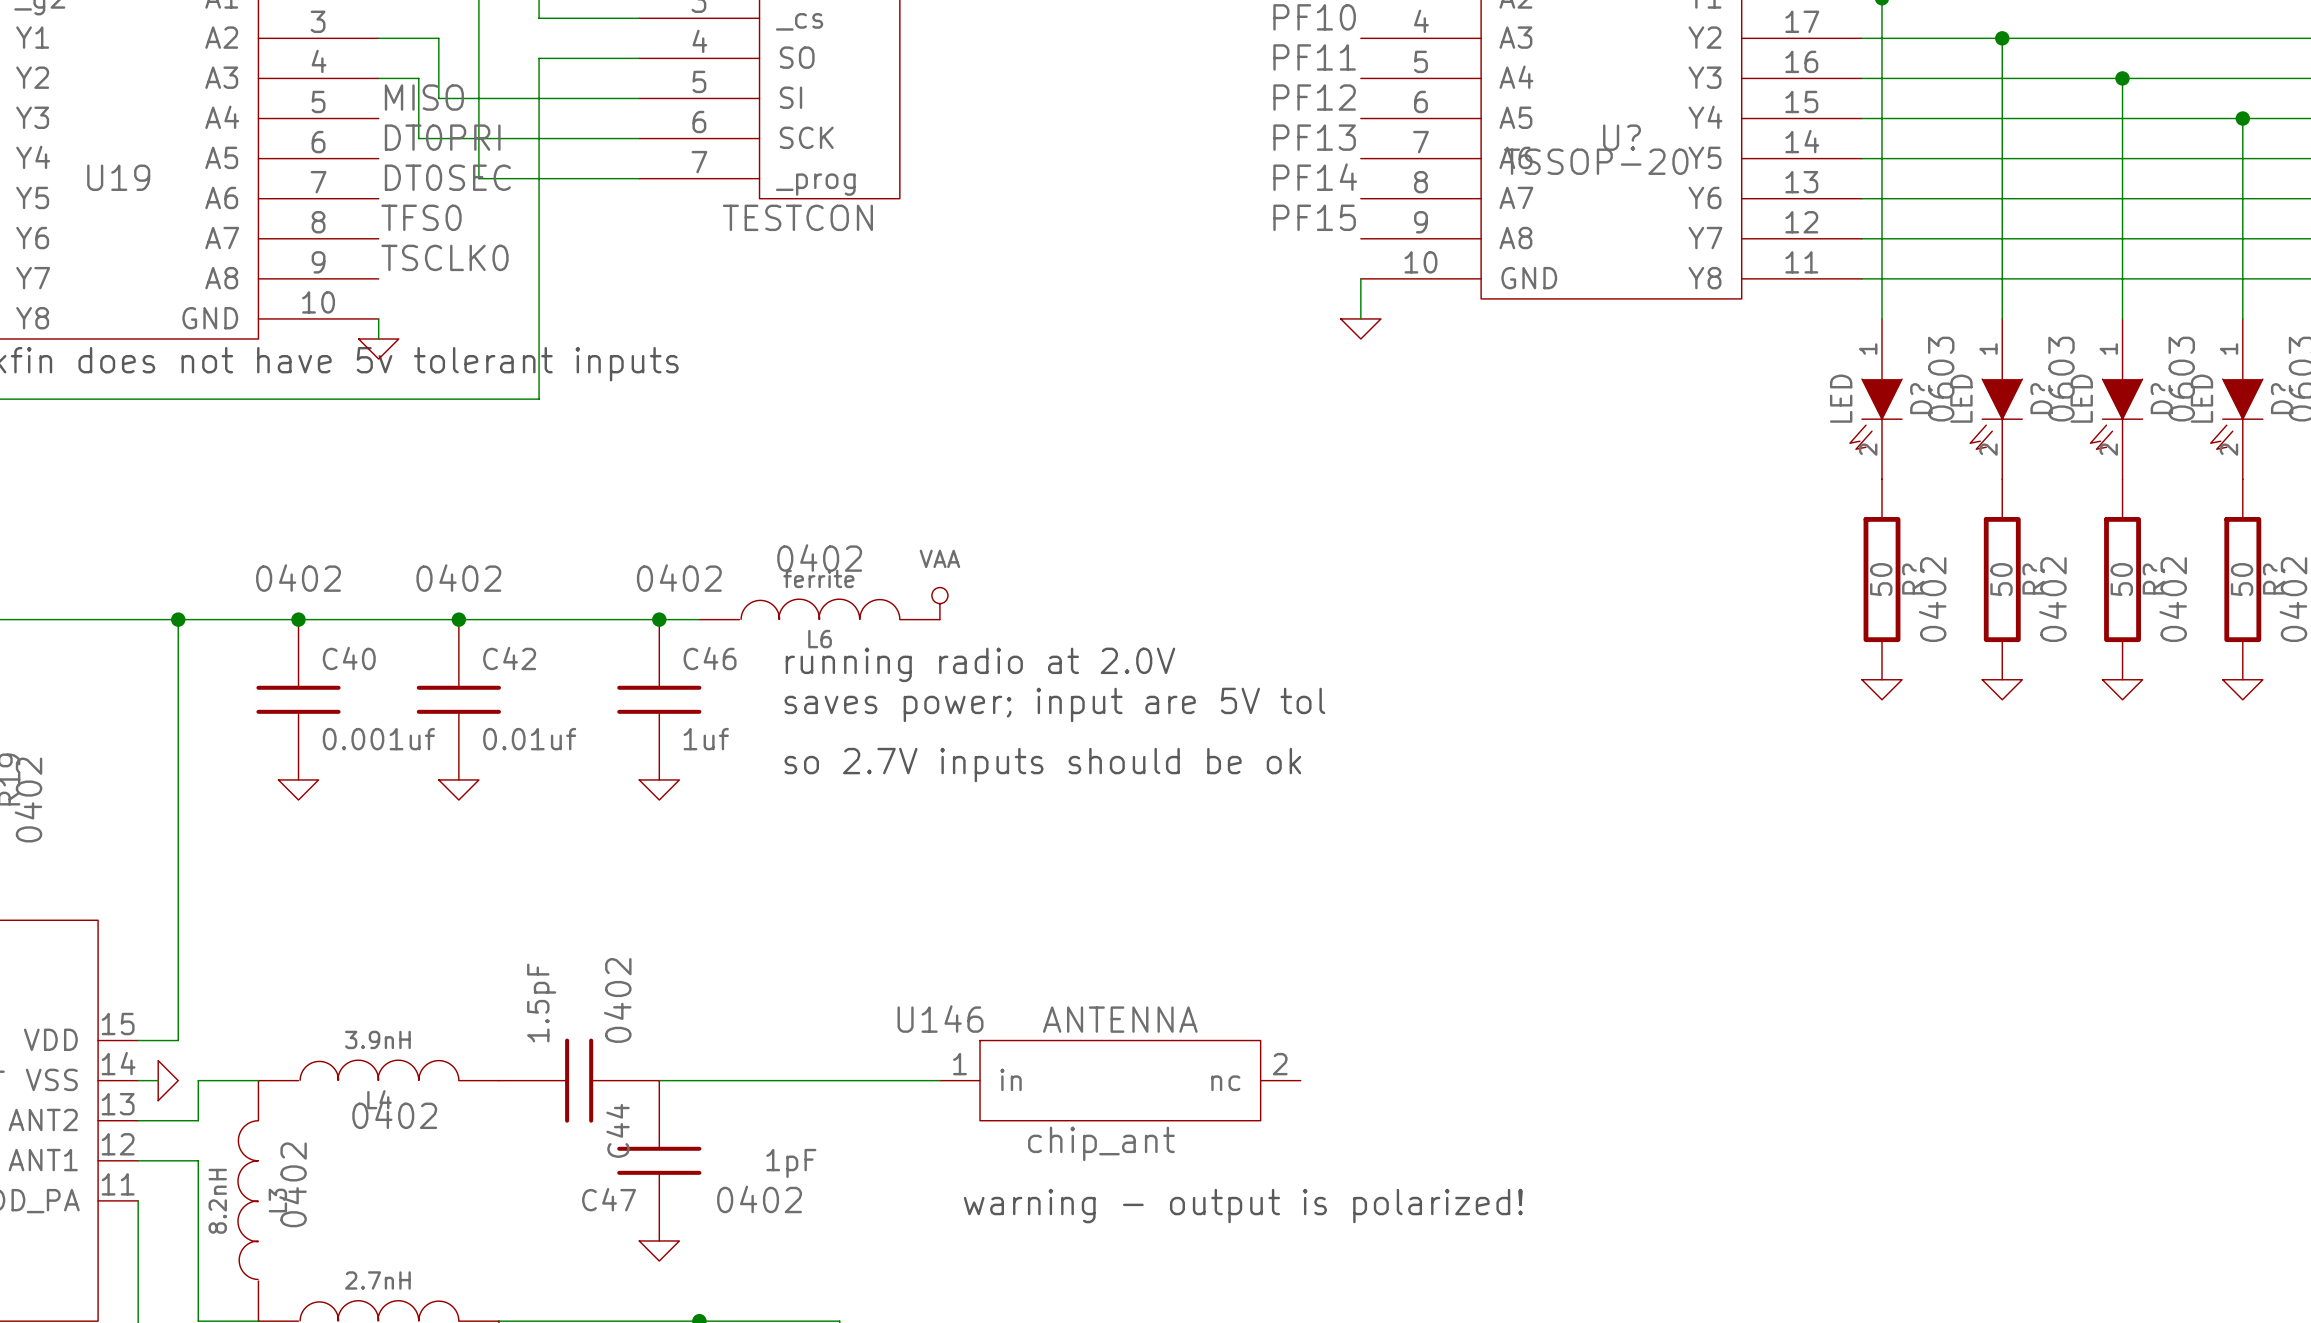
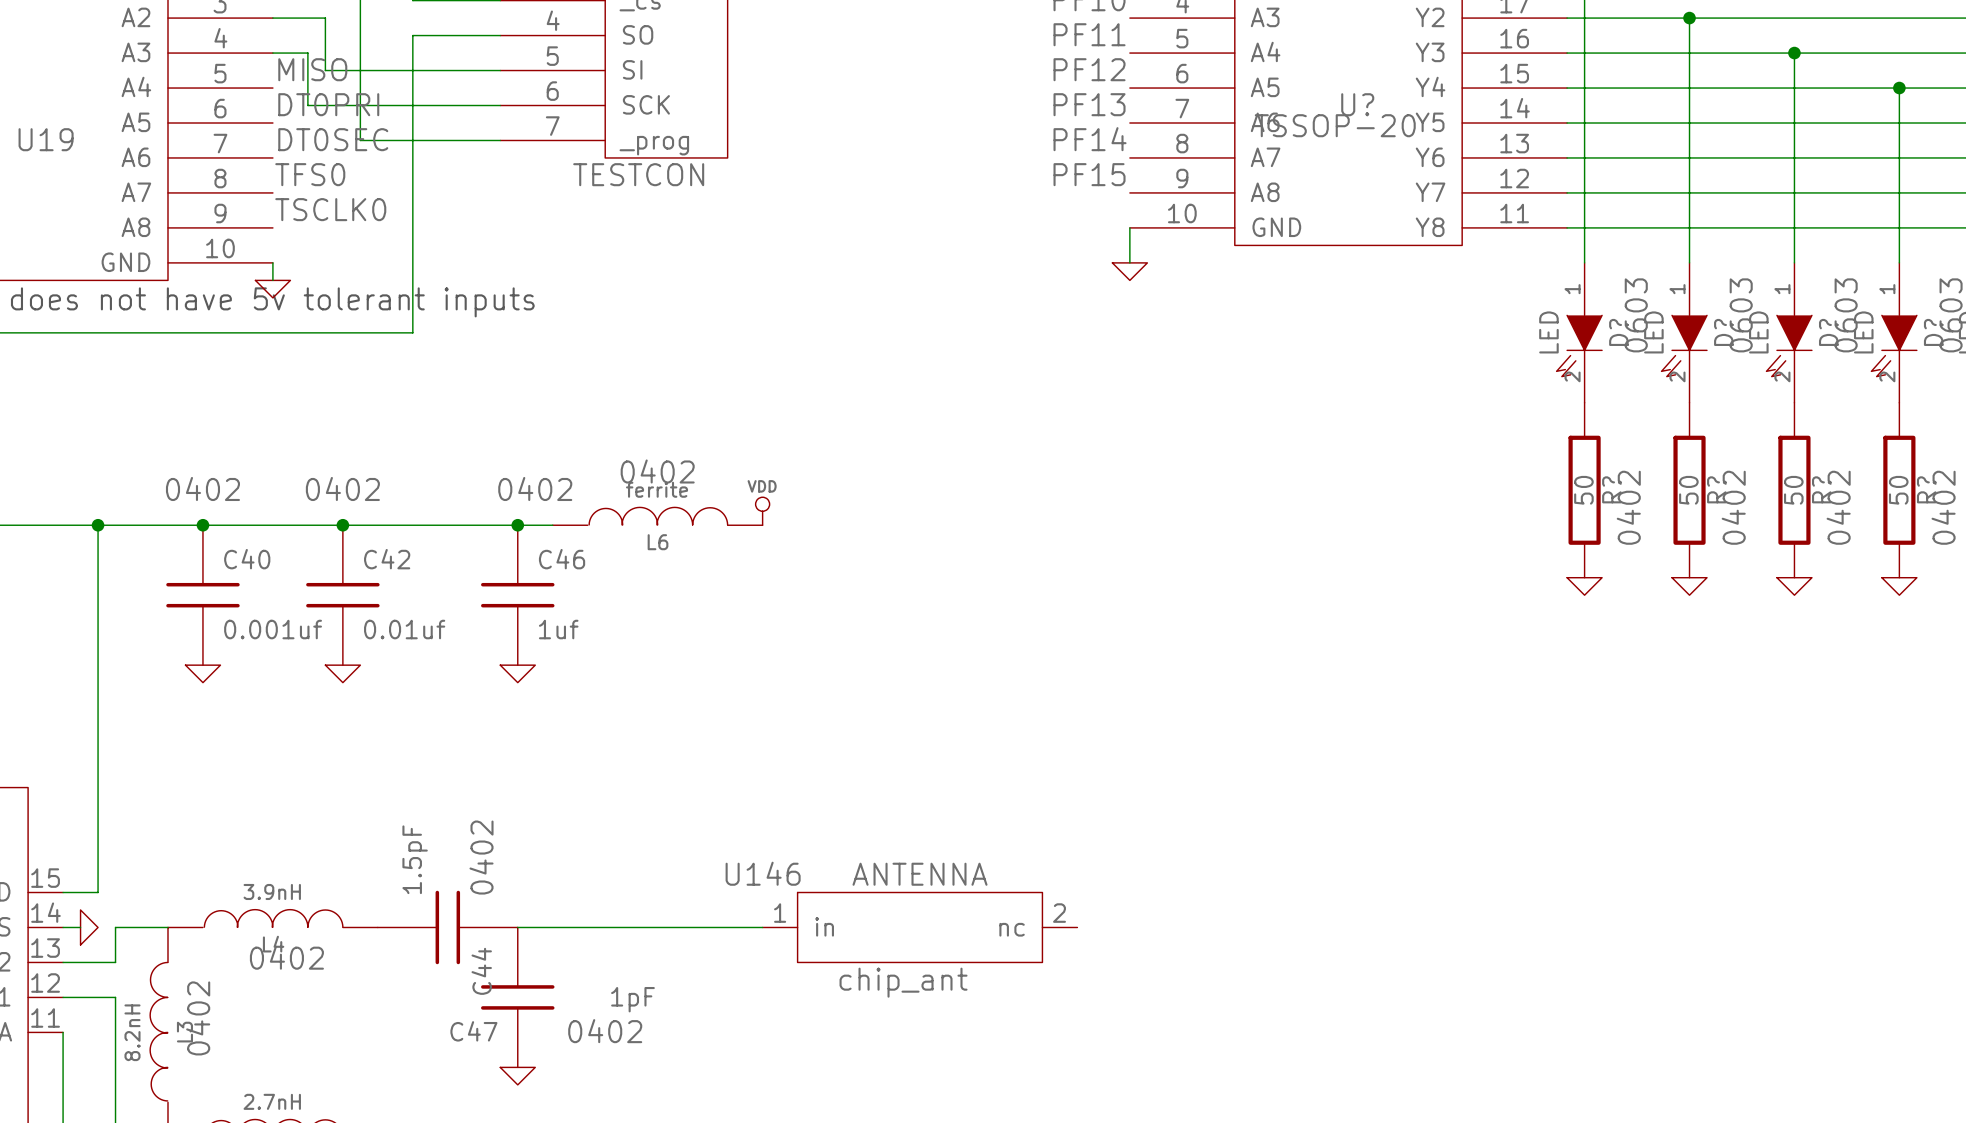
power symbol: VAA (939, 603) -> VDD (762, 511)
text: running radio at 2.0V (980, 664) -> none
text: saves power; input are 5V tol (1054, 704) -> none
text: so 2.7V inputs should be ok (1042, 765) -> none
text: warning - output is polarized! (1243, 1206) -> none

